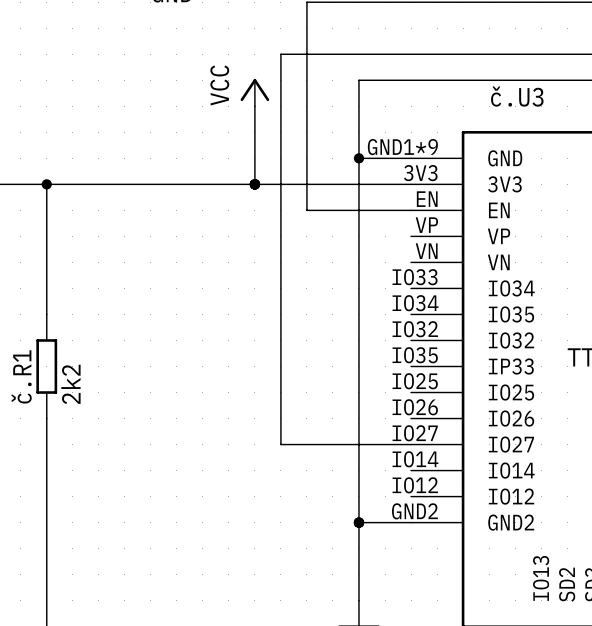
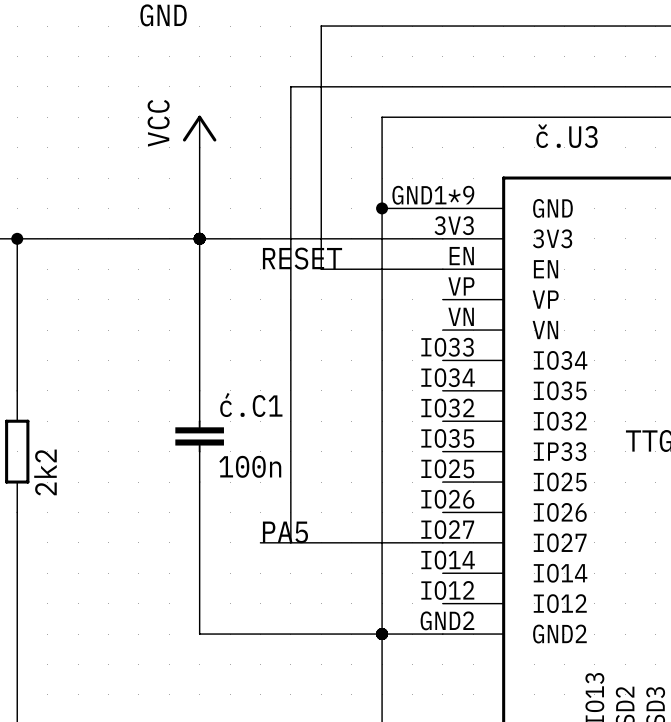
power symbol position: VCC (254, 92) -> VCC (199, 131)
wire: none -> (199, 147) (199, 390)
wire: (254, 106) (254, 184) -> none
junction position: (254, 184) -> (199, 238)
label: none -> RESET (302, 258)
ć.C1: none -> 100n (199, 436)
wire: none -> (199, 482) (199, 634) (382, 634)
label: none -> PA5 (285, 532)
wire: none -> (260, 542) (290, 542)

